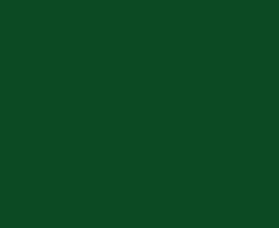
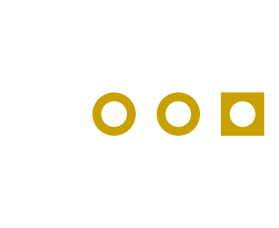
part: none -> (178, 114)

